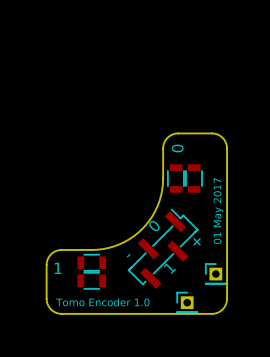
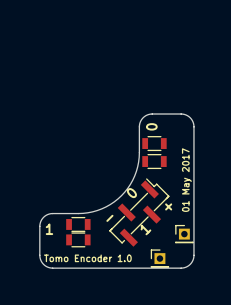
part: none -> (154, 143)
part: (175, 178) -> none
part: (193, 178) -> none
part: none -> (154, 161)

